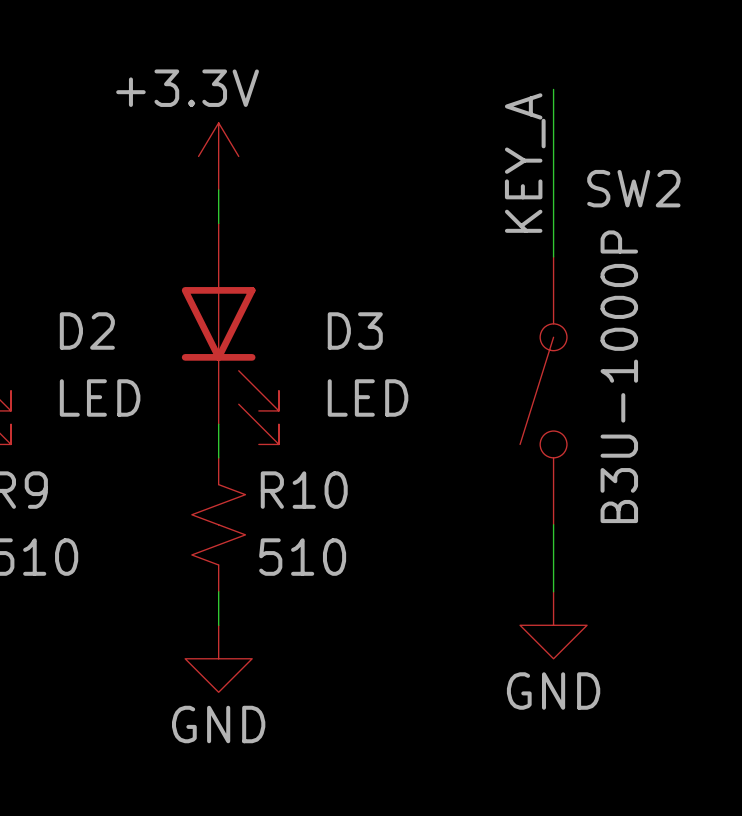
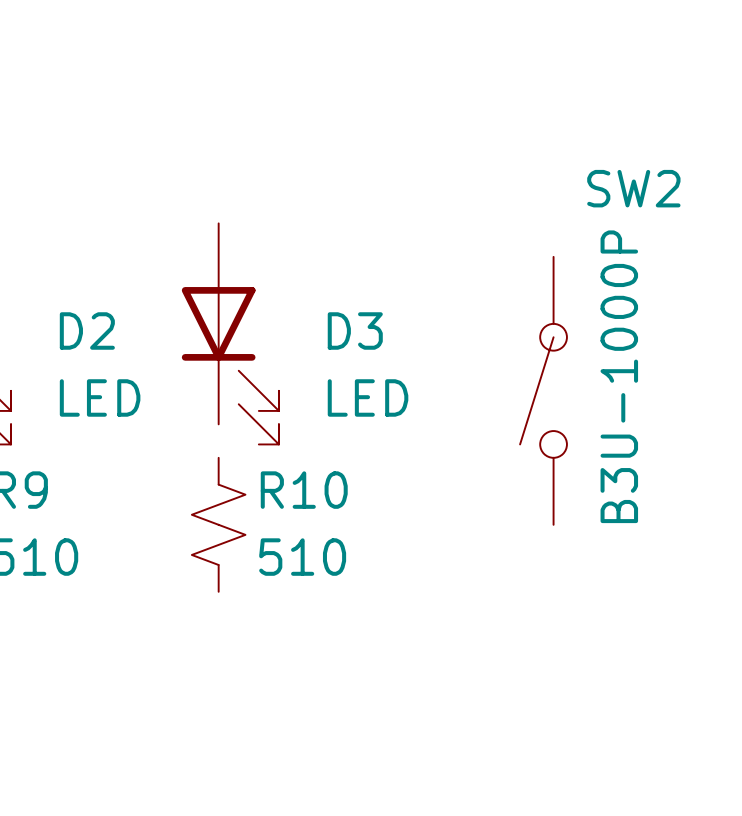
wire: (553, 89) (553, 256) -> none
power symbol: +3.3V (218, 156) -> none
label: KEY_A (525, 163) -> none
wire: (218, 189) (218, 223) -> none
wire: (218, 424) (218, 457) -> none
wire: (553, 524) (553, 591) -> none
wire: (218, 591) (218, 625) -> none
power symbol: GND (553, 625) -> none
power symbol: GND (218, 658) -> none

